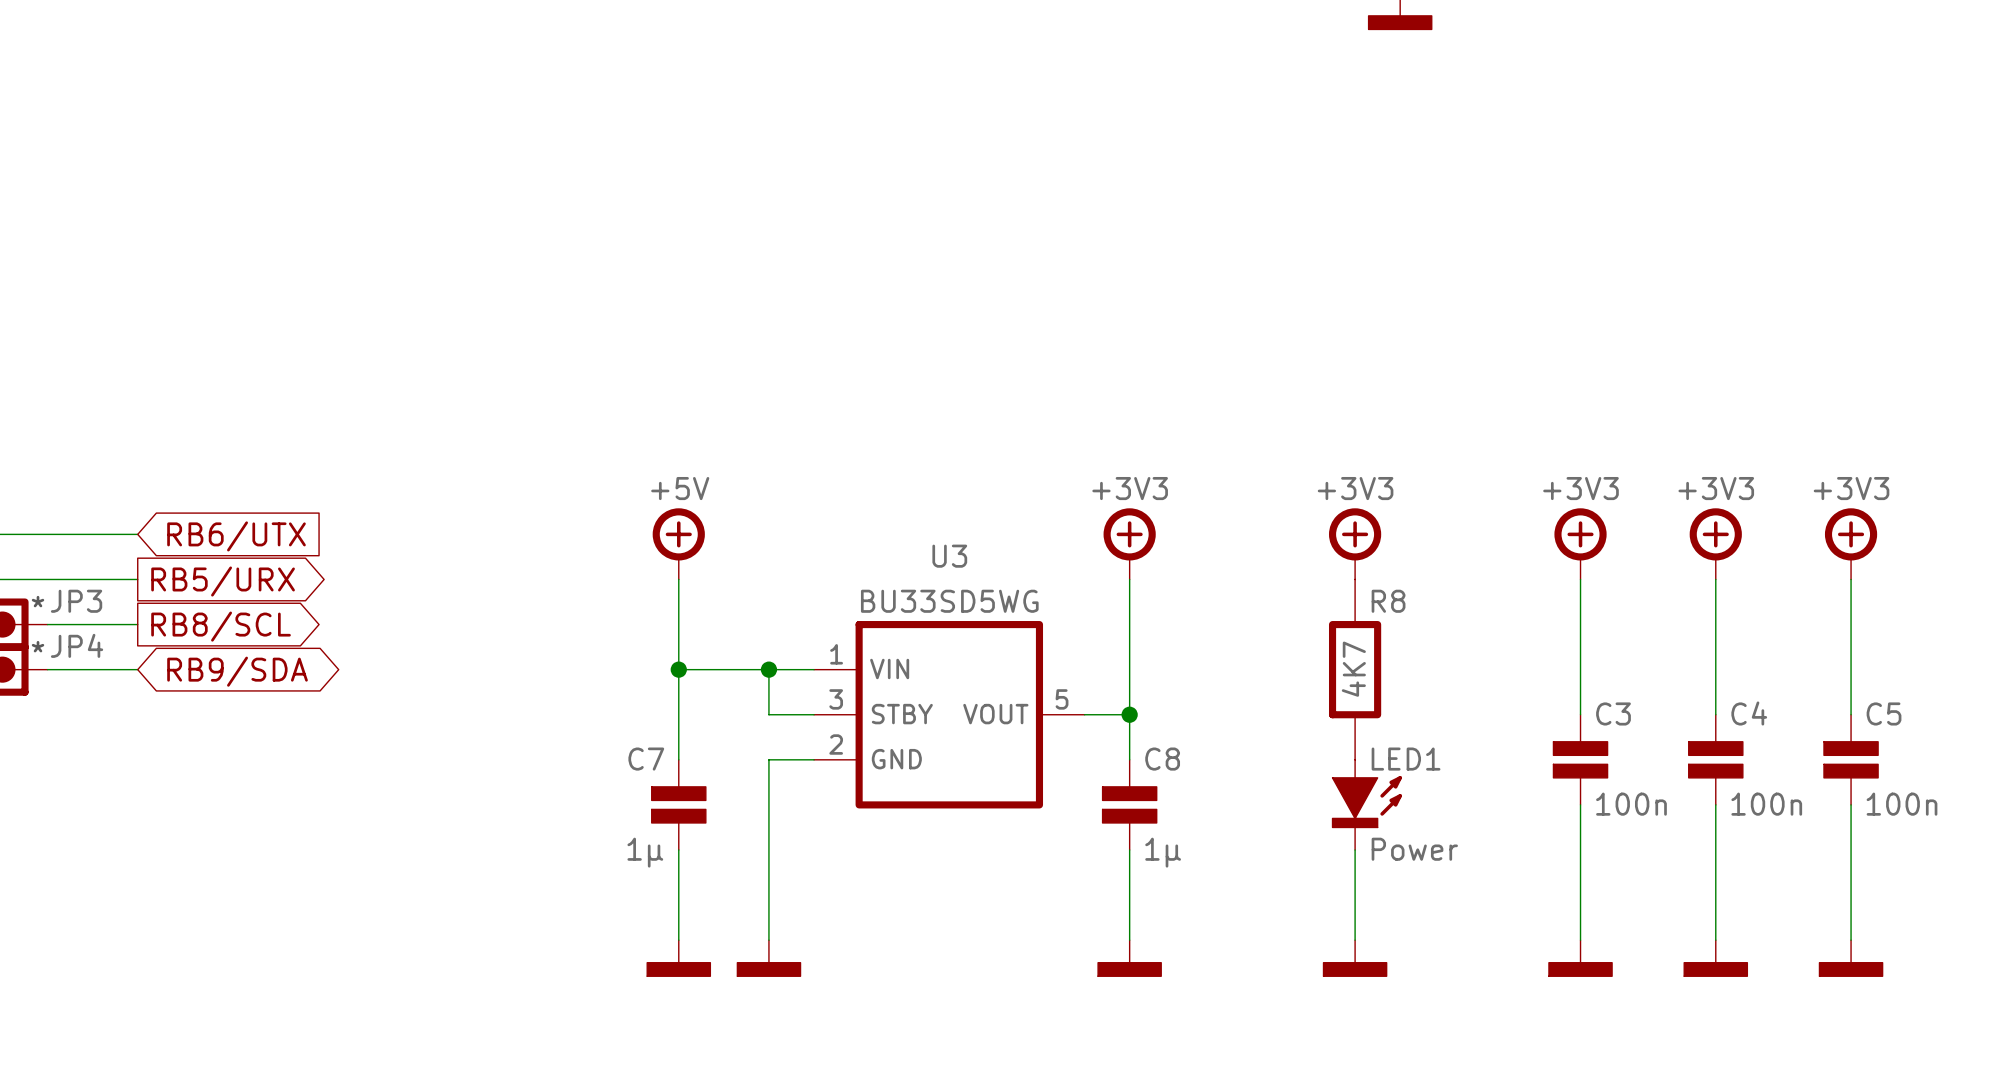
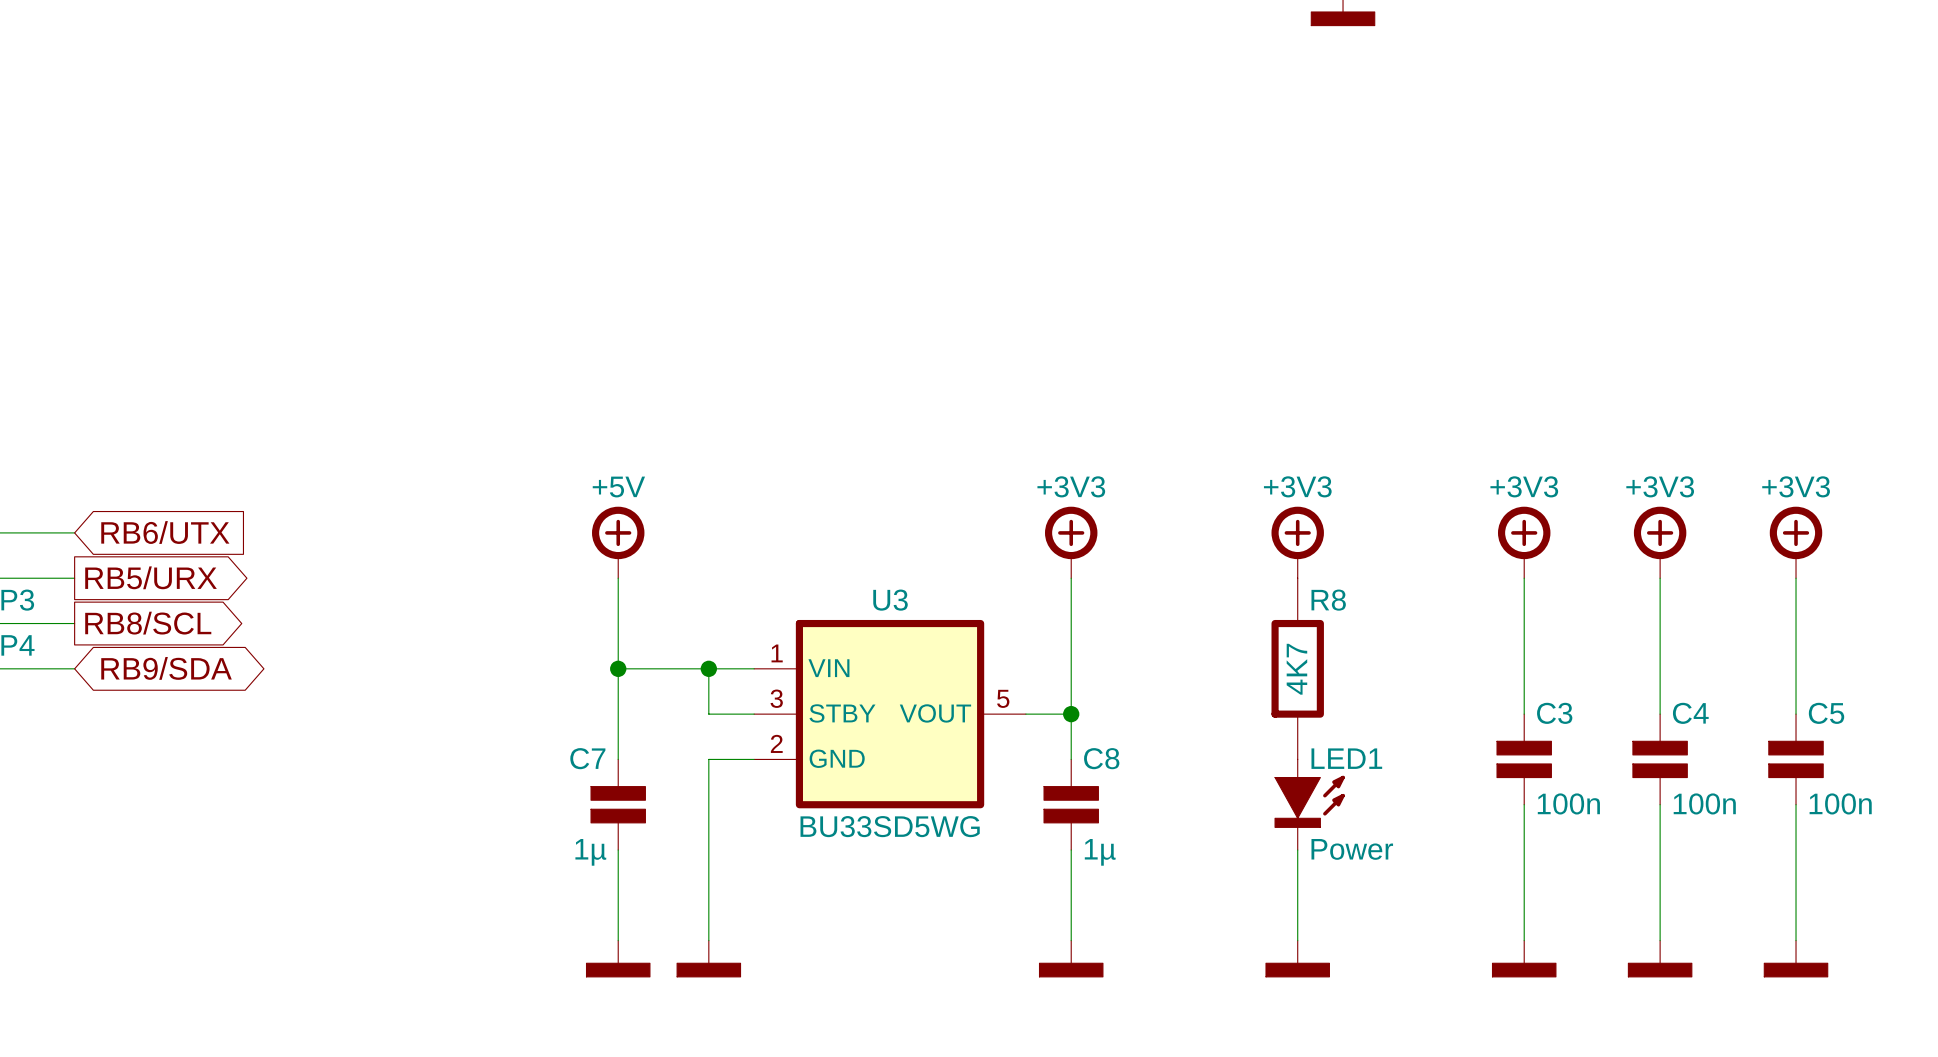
U3 name position: U3 (949, 556) -> U3 (890, 600)
U3 value position: BU33SD5WG (949, 601) -> BU33SD5WG (890, 826)

